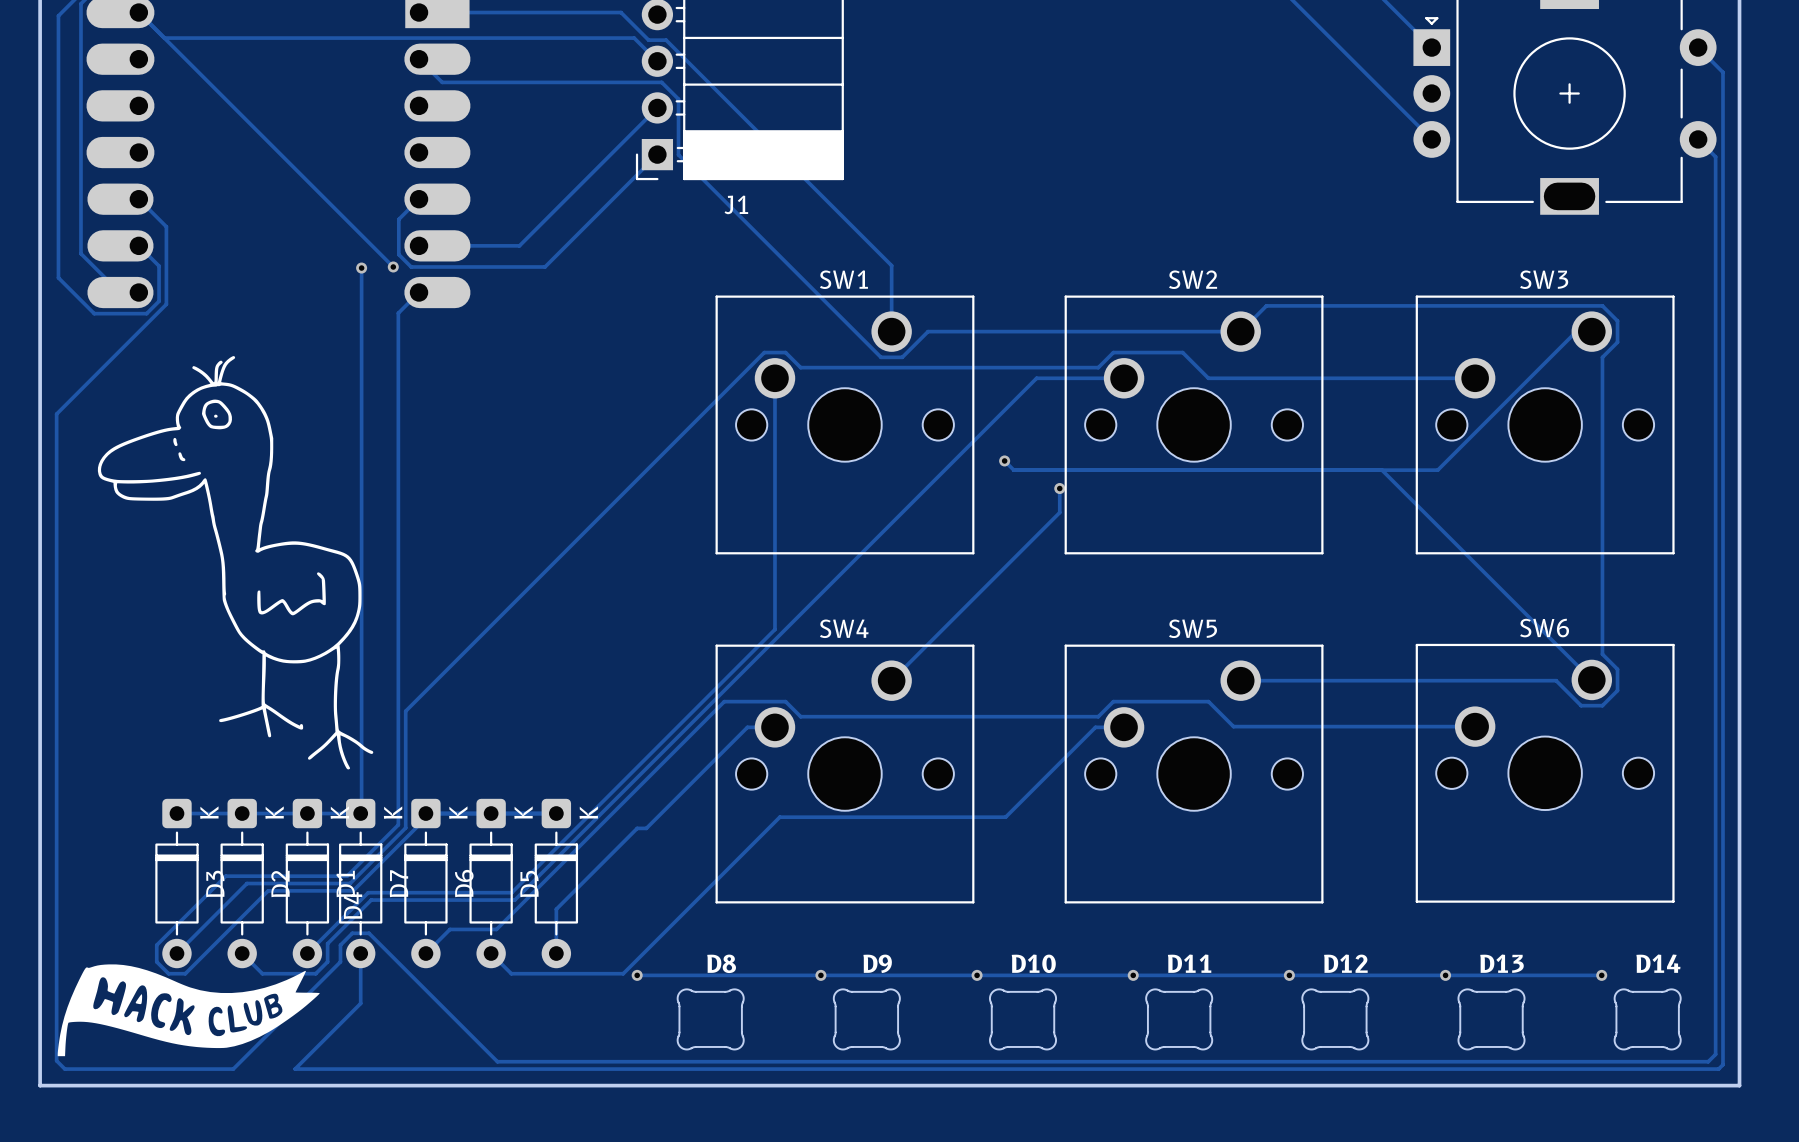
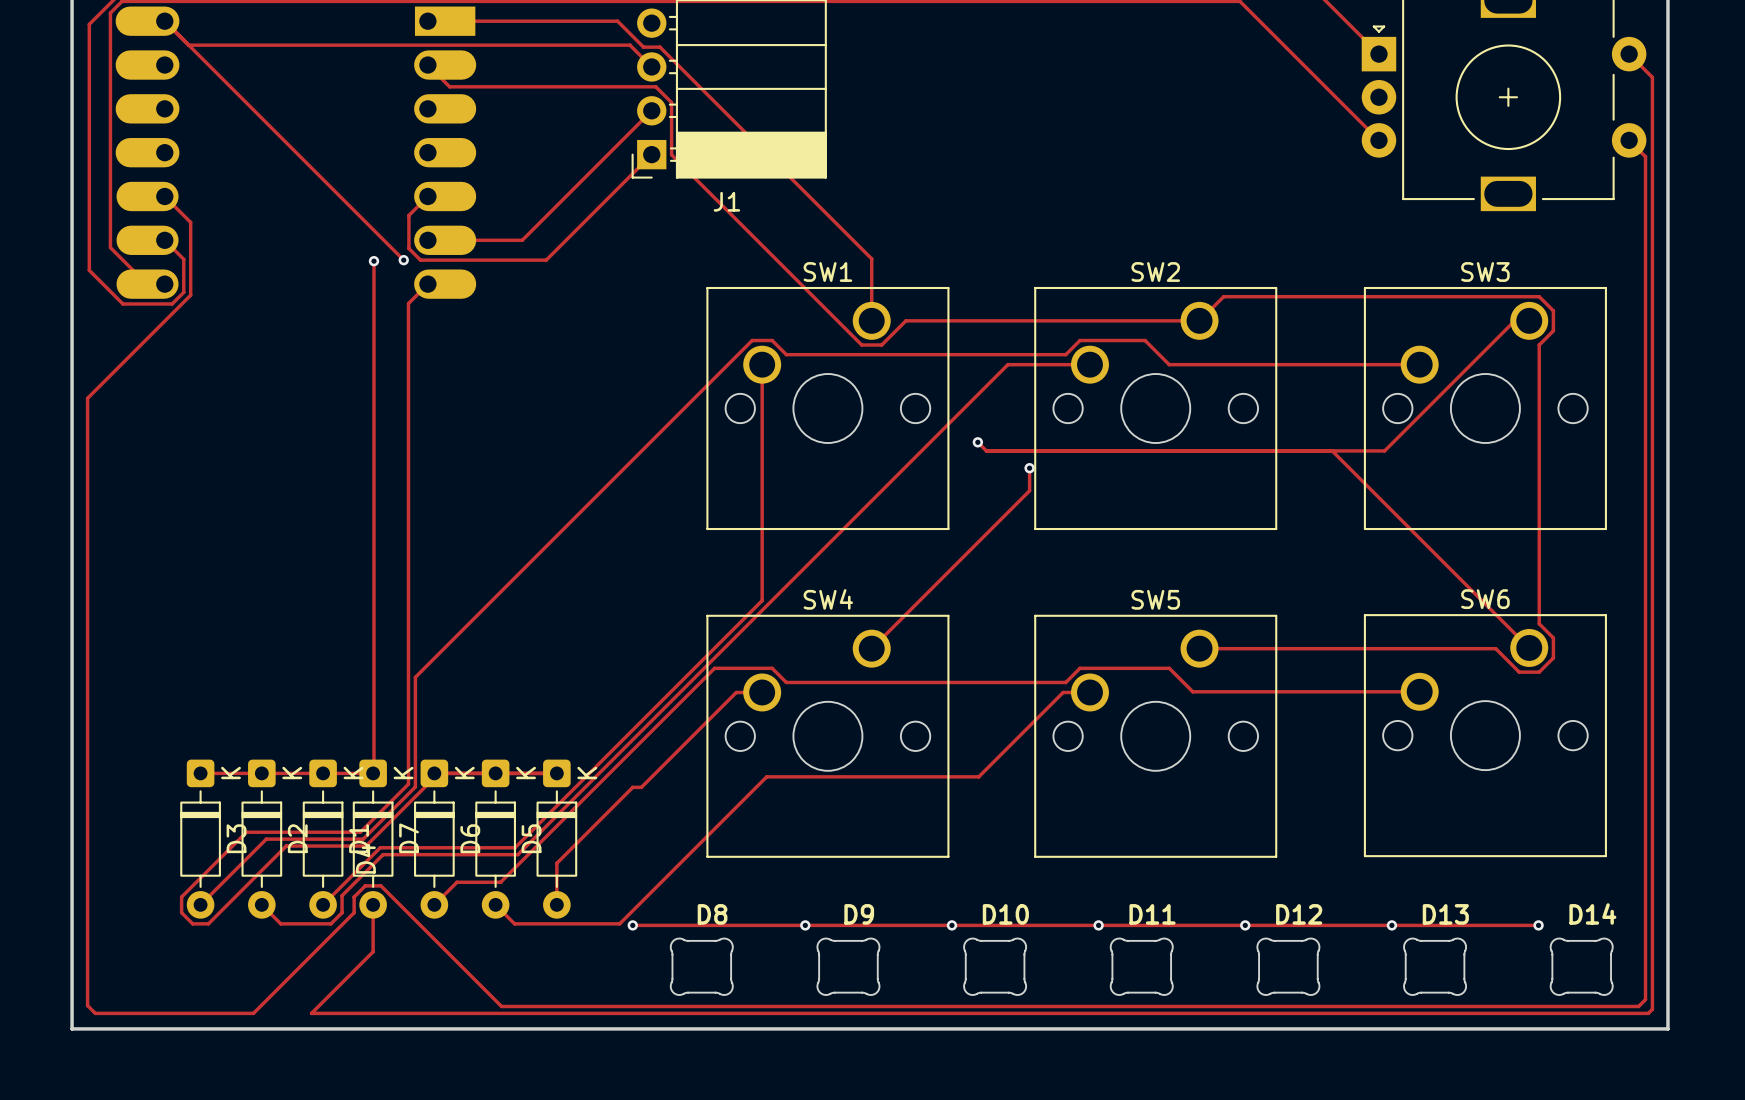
drawing: [97, 356, 374, 770] -> none
drawing: [57, 964, 320, 1057] -> none

